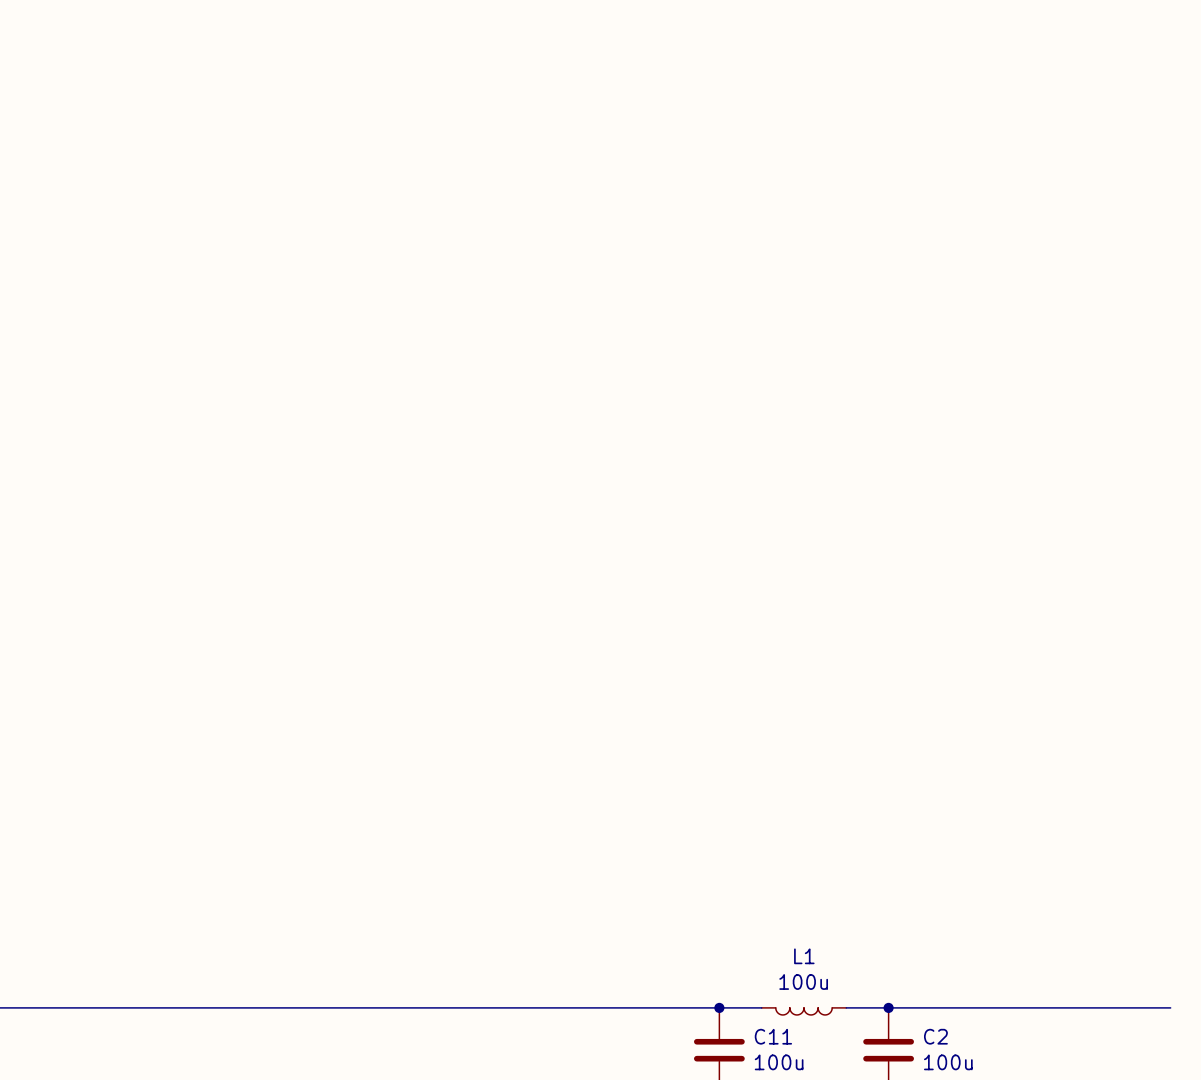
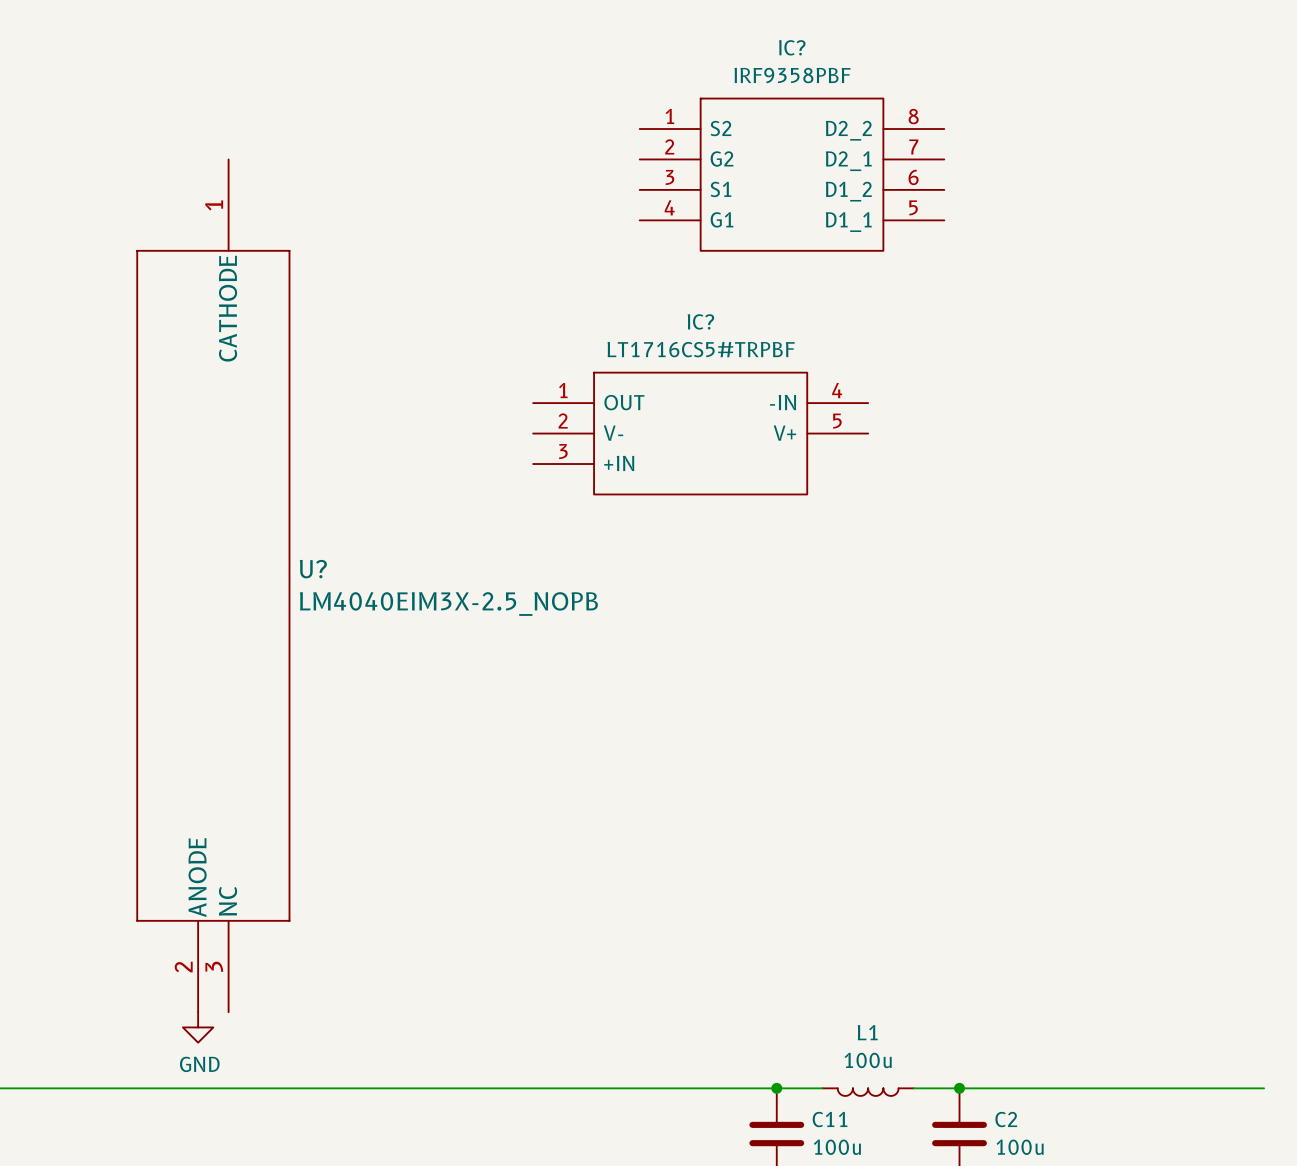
IC?: none -> IRF9358PBF (792, 174)
IC?: none -> LT1716CS5#TRPBF (700, 433)
U?: none -> LM4040EIM3X-2.5_NOPB (213, 585)
power symbol: none -> GND (198, 1027)

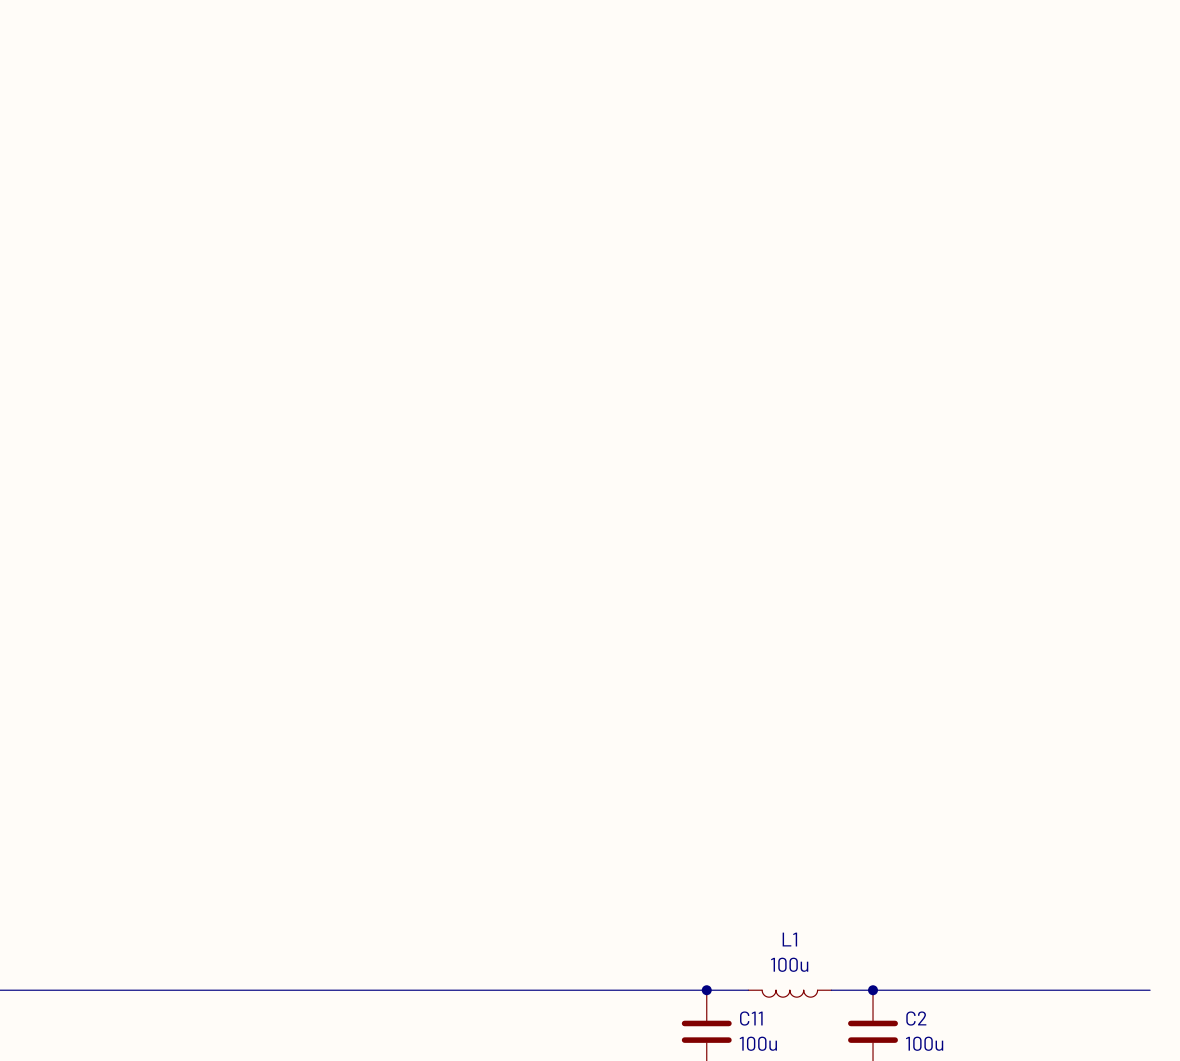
IC?: IRF9358PBF (792, 174) -> none
IC?: LT1716CS5#TRPBF (700, 433) -> none
U?: LM4040EIM3X-2.5_NOPB (213, 585) -> none
power symbol: GND (198, 1027) -> none

